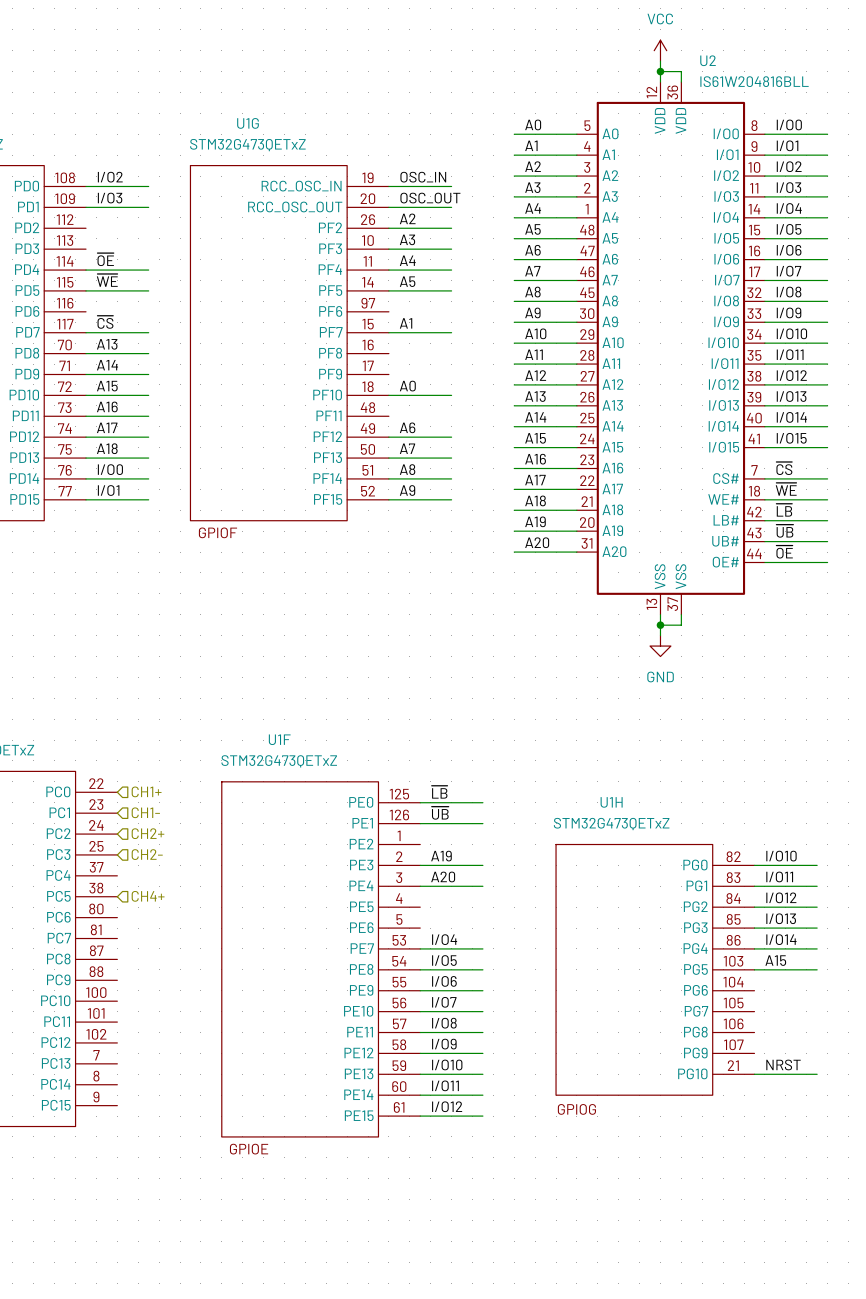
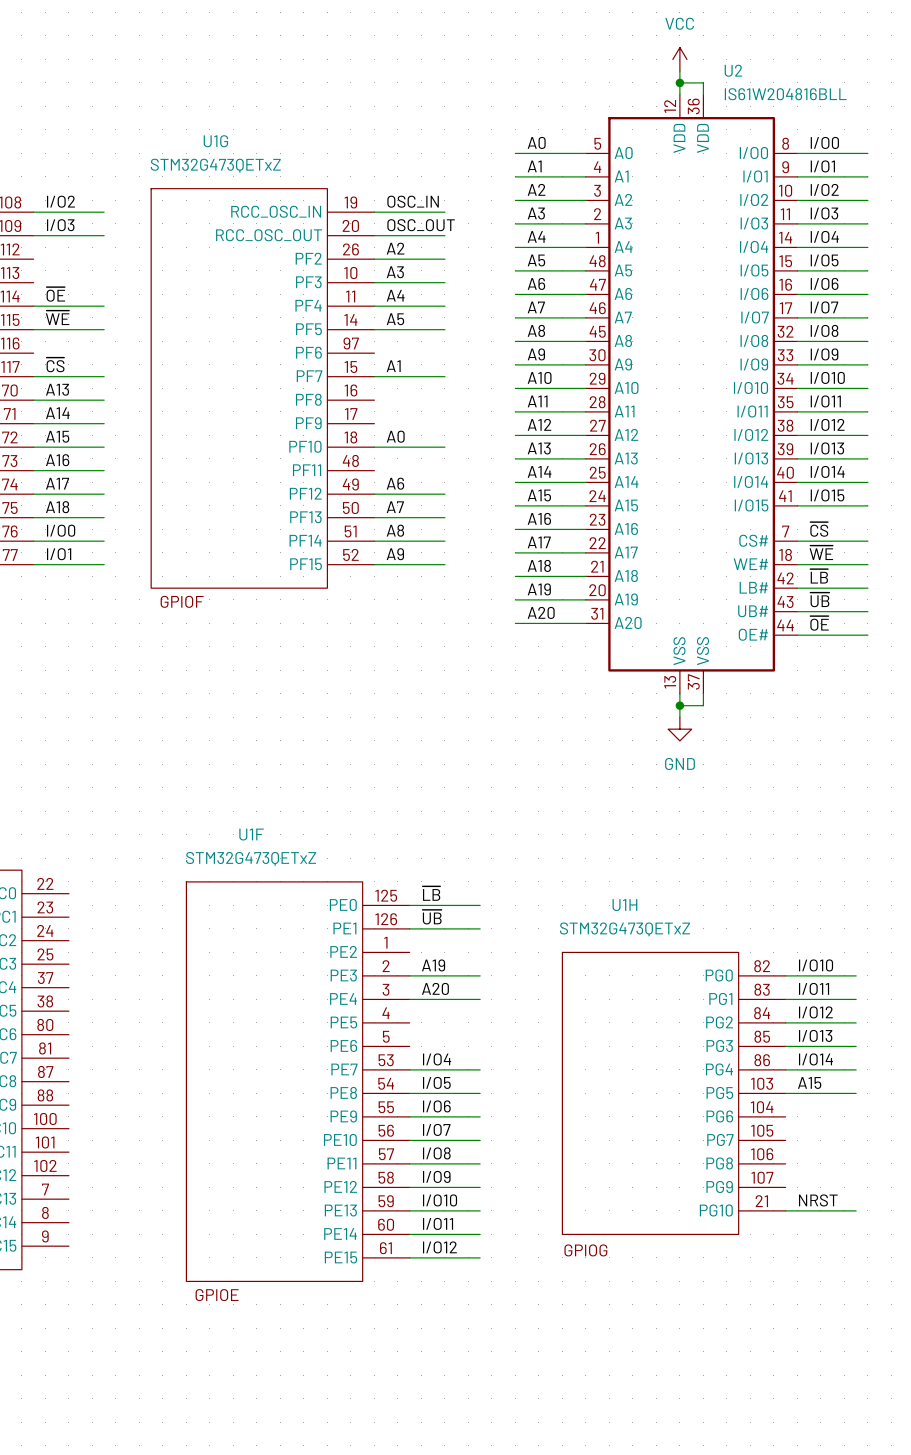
hierarchical label: CH1+ (146, 791) -> none
hierarchical label: CH1- (145, 812) -> none
hierarchical label: CH2+ (147, 833) -> none
hierarchical label: CH2- (147, 854) -> none
hierarchical label: CH4+ (148, 896) -> none

